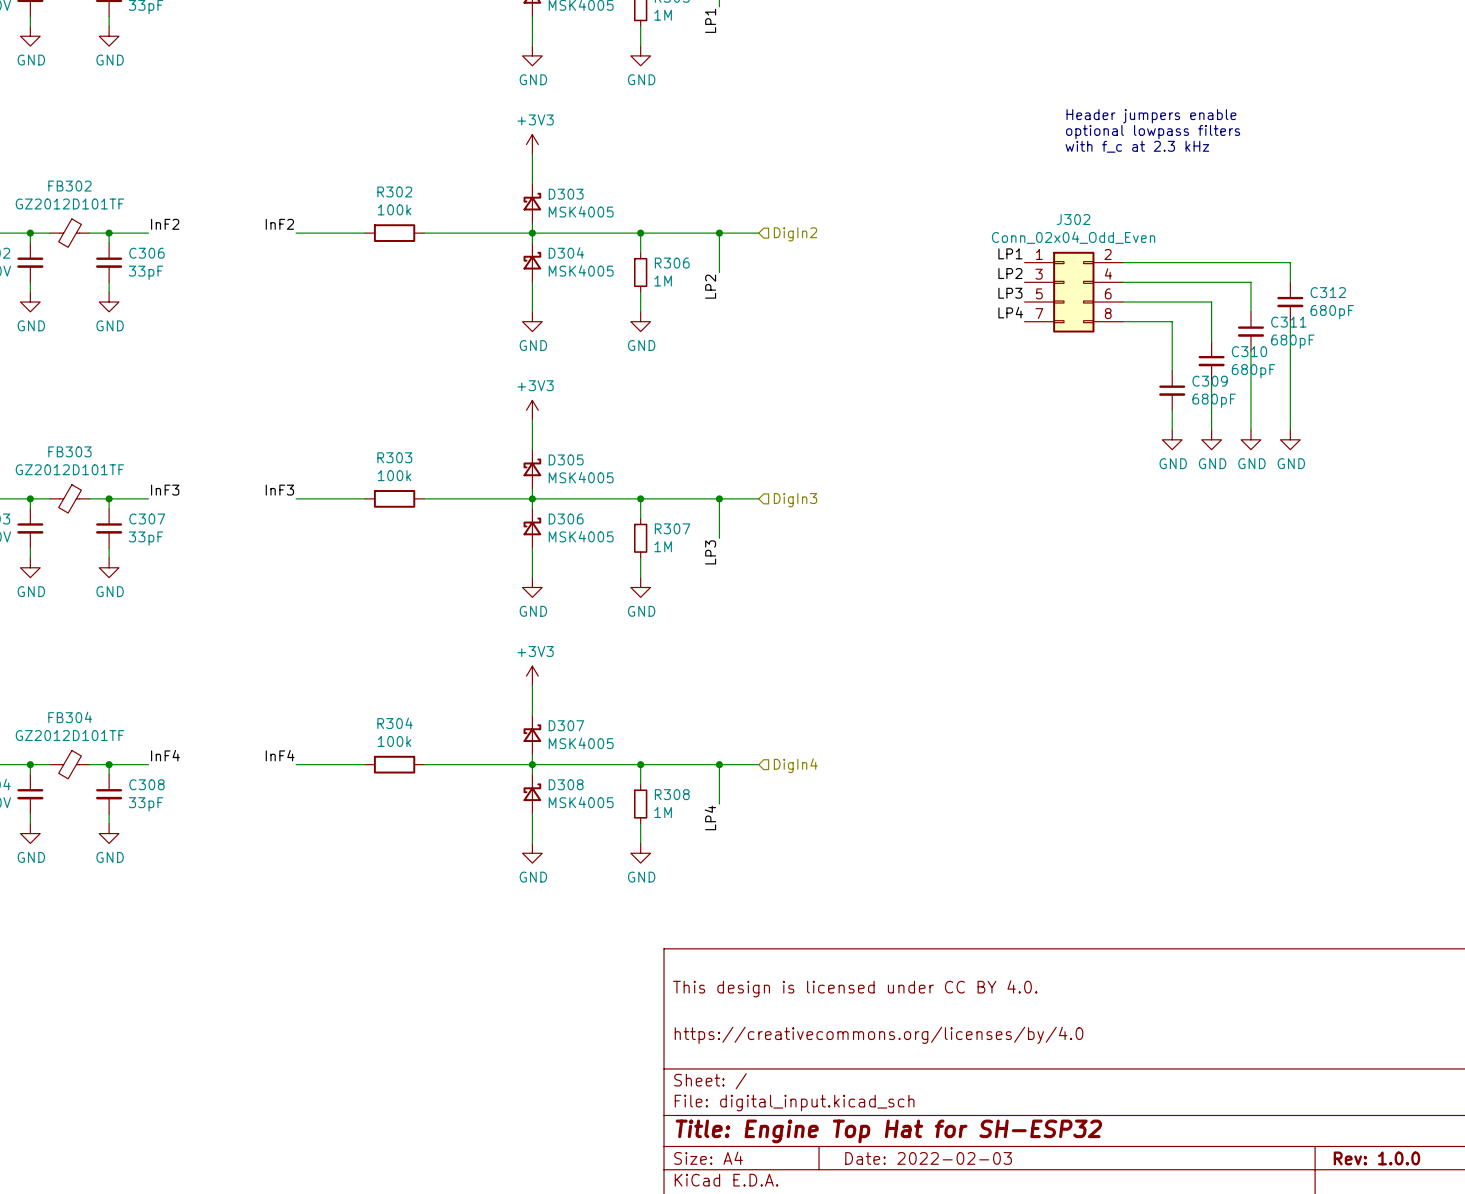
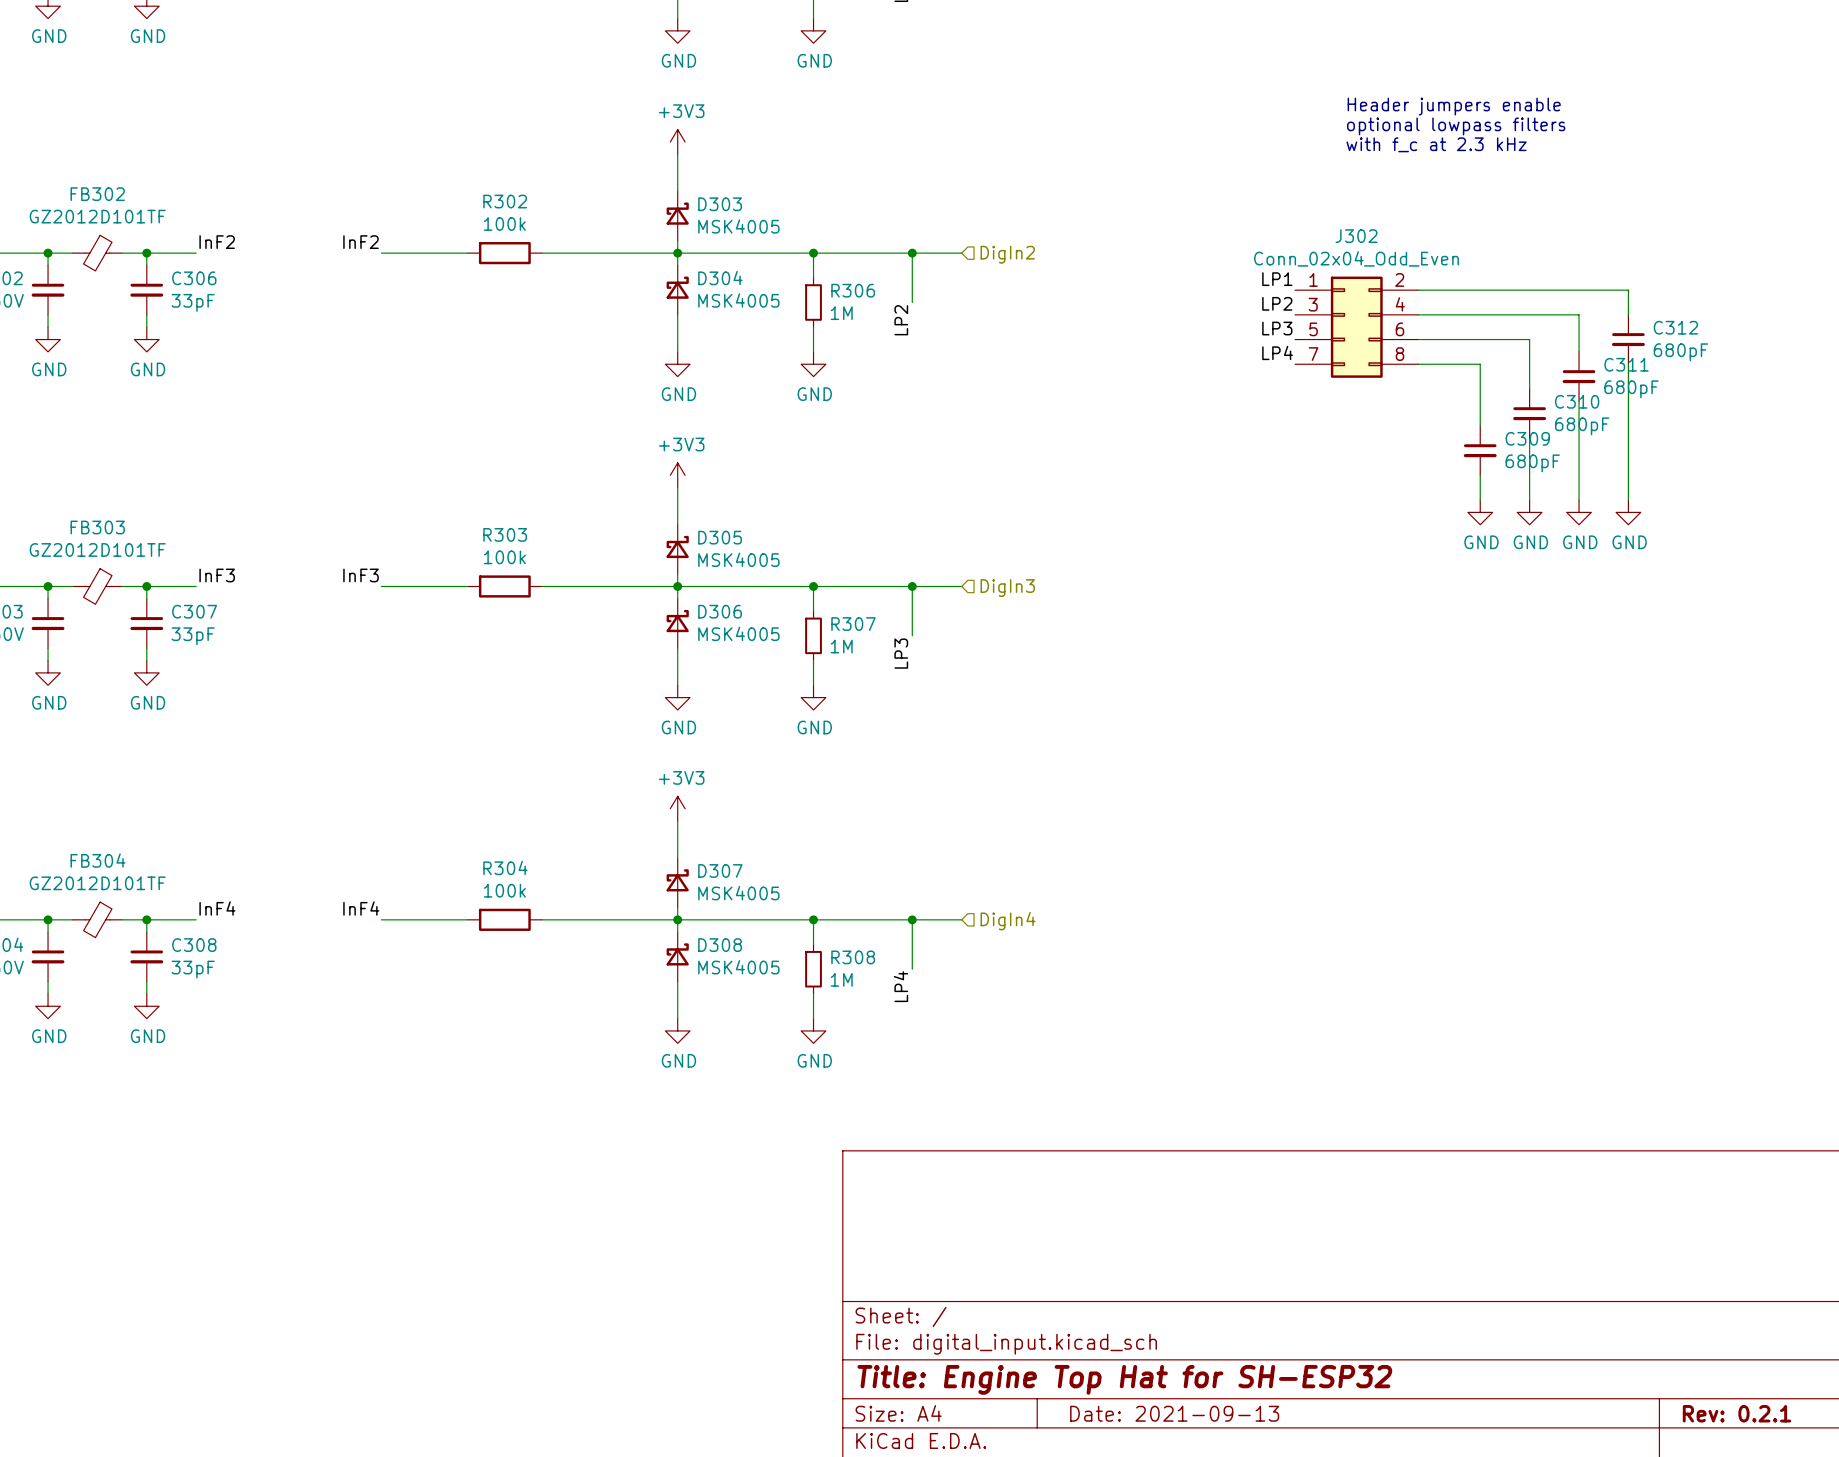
title block: This design is licensed under CC BY 4.0. (855, 988) -> none
title block: https://creativecommons.org/licenses/by/4.0 (879, 1035) -> none
title block: Date: 2022-02-03 (928, 1158) -> Date: 2021-09-13 (1174, 1413)
title block: Rev: 1.0.0 (1376, 1158) -> Rev: 0.2.1 (1737, 1413)

